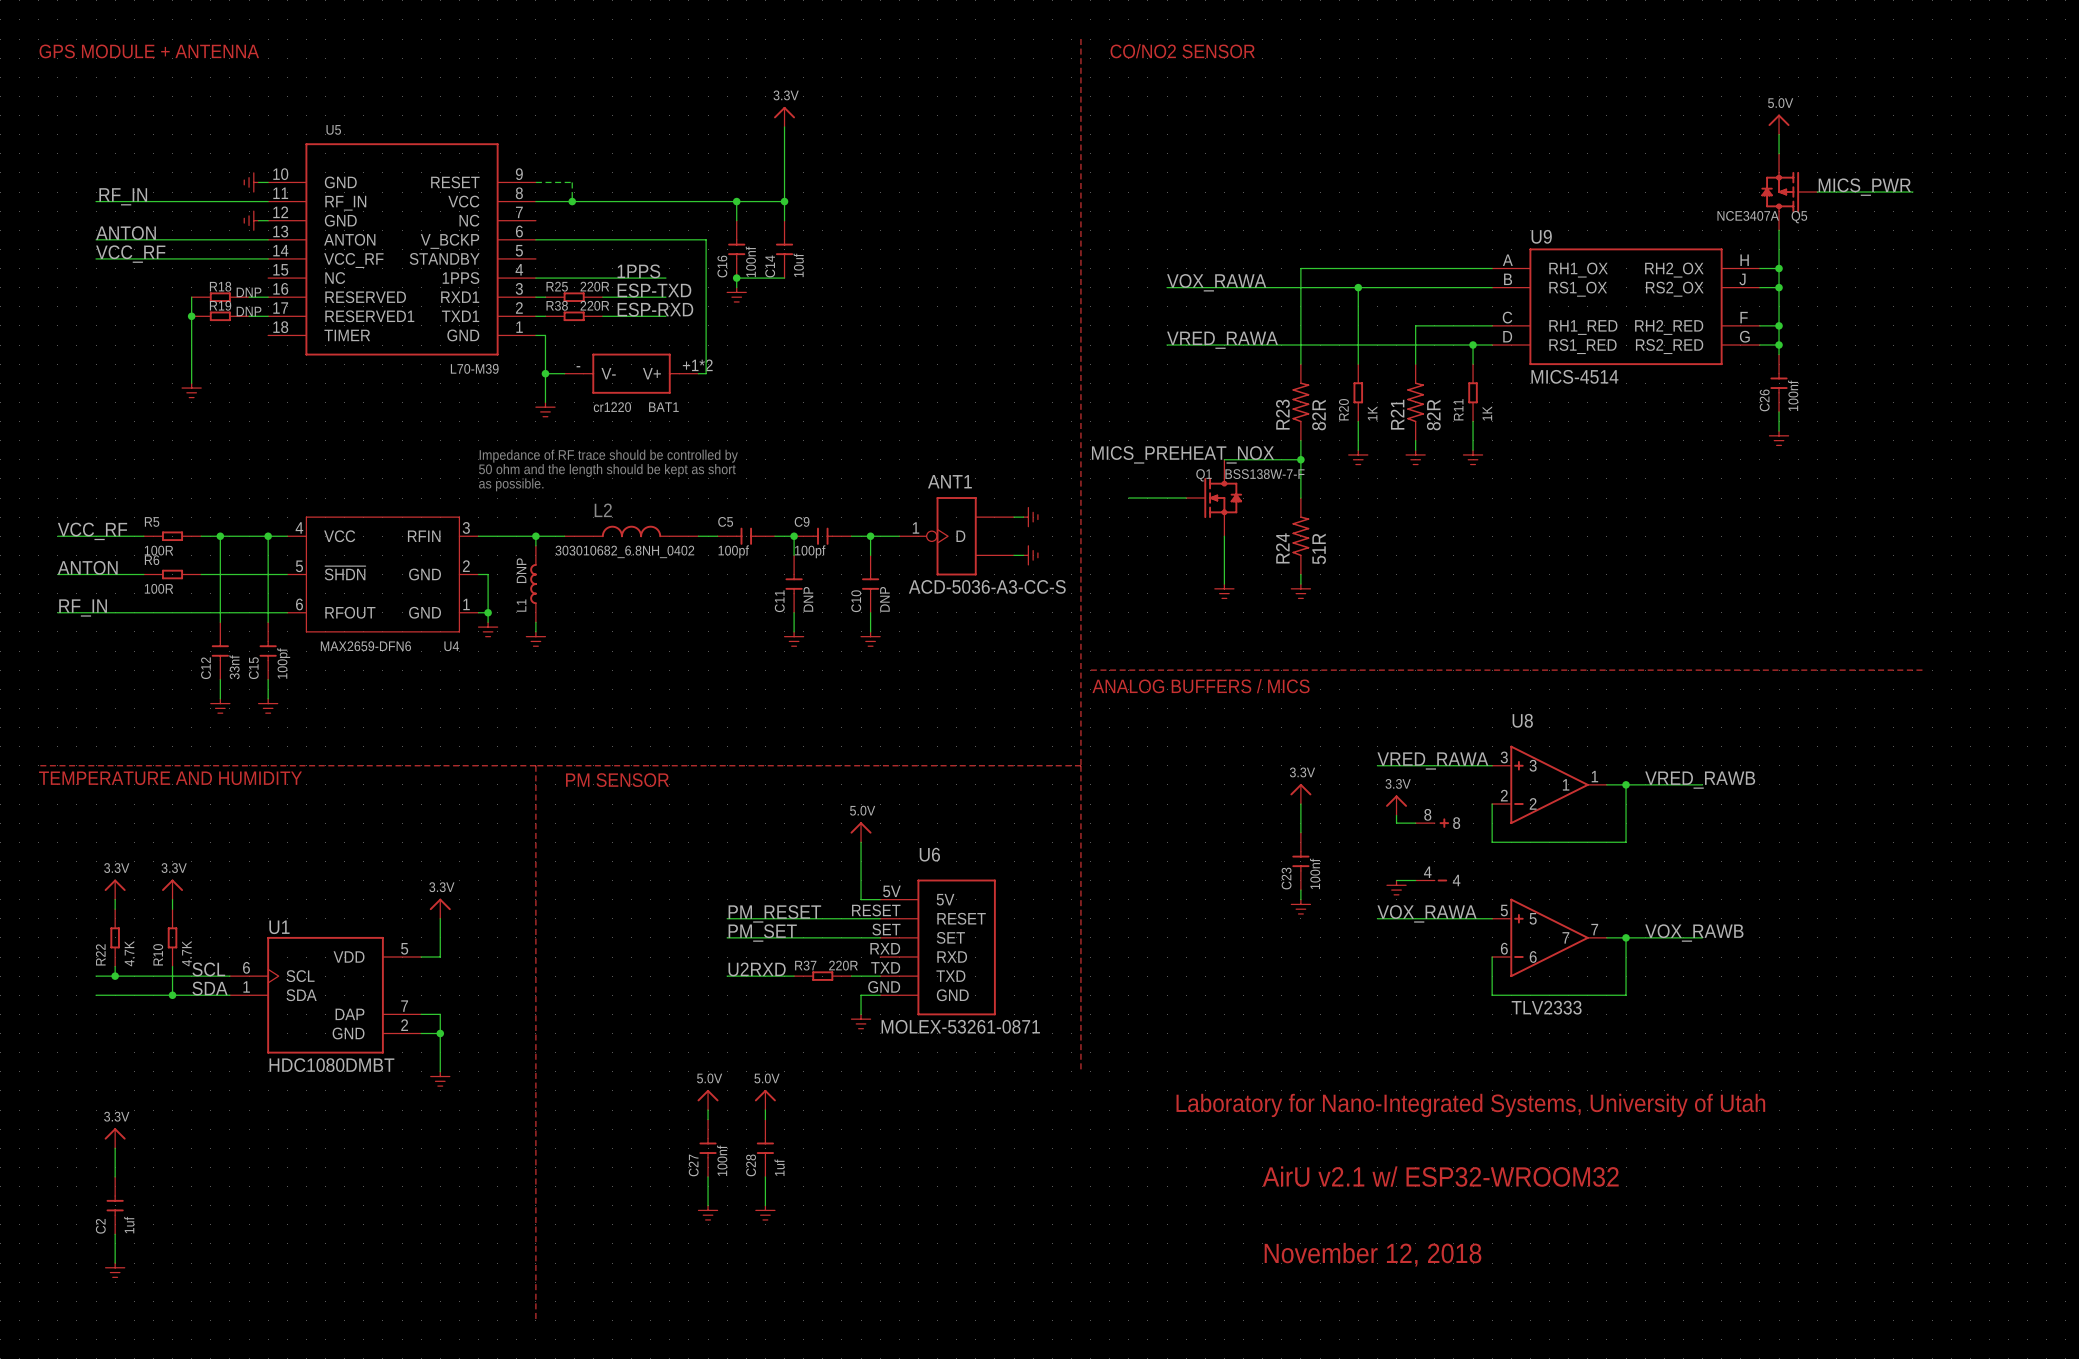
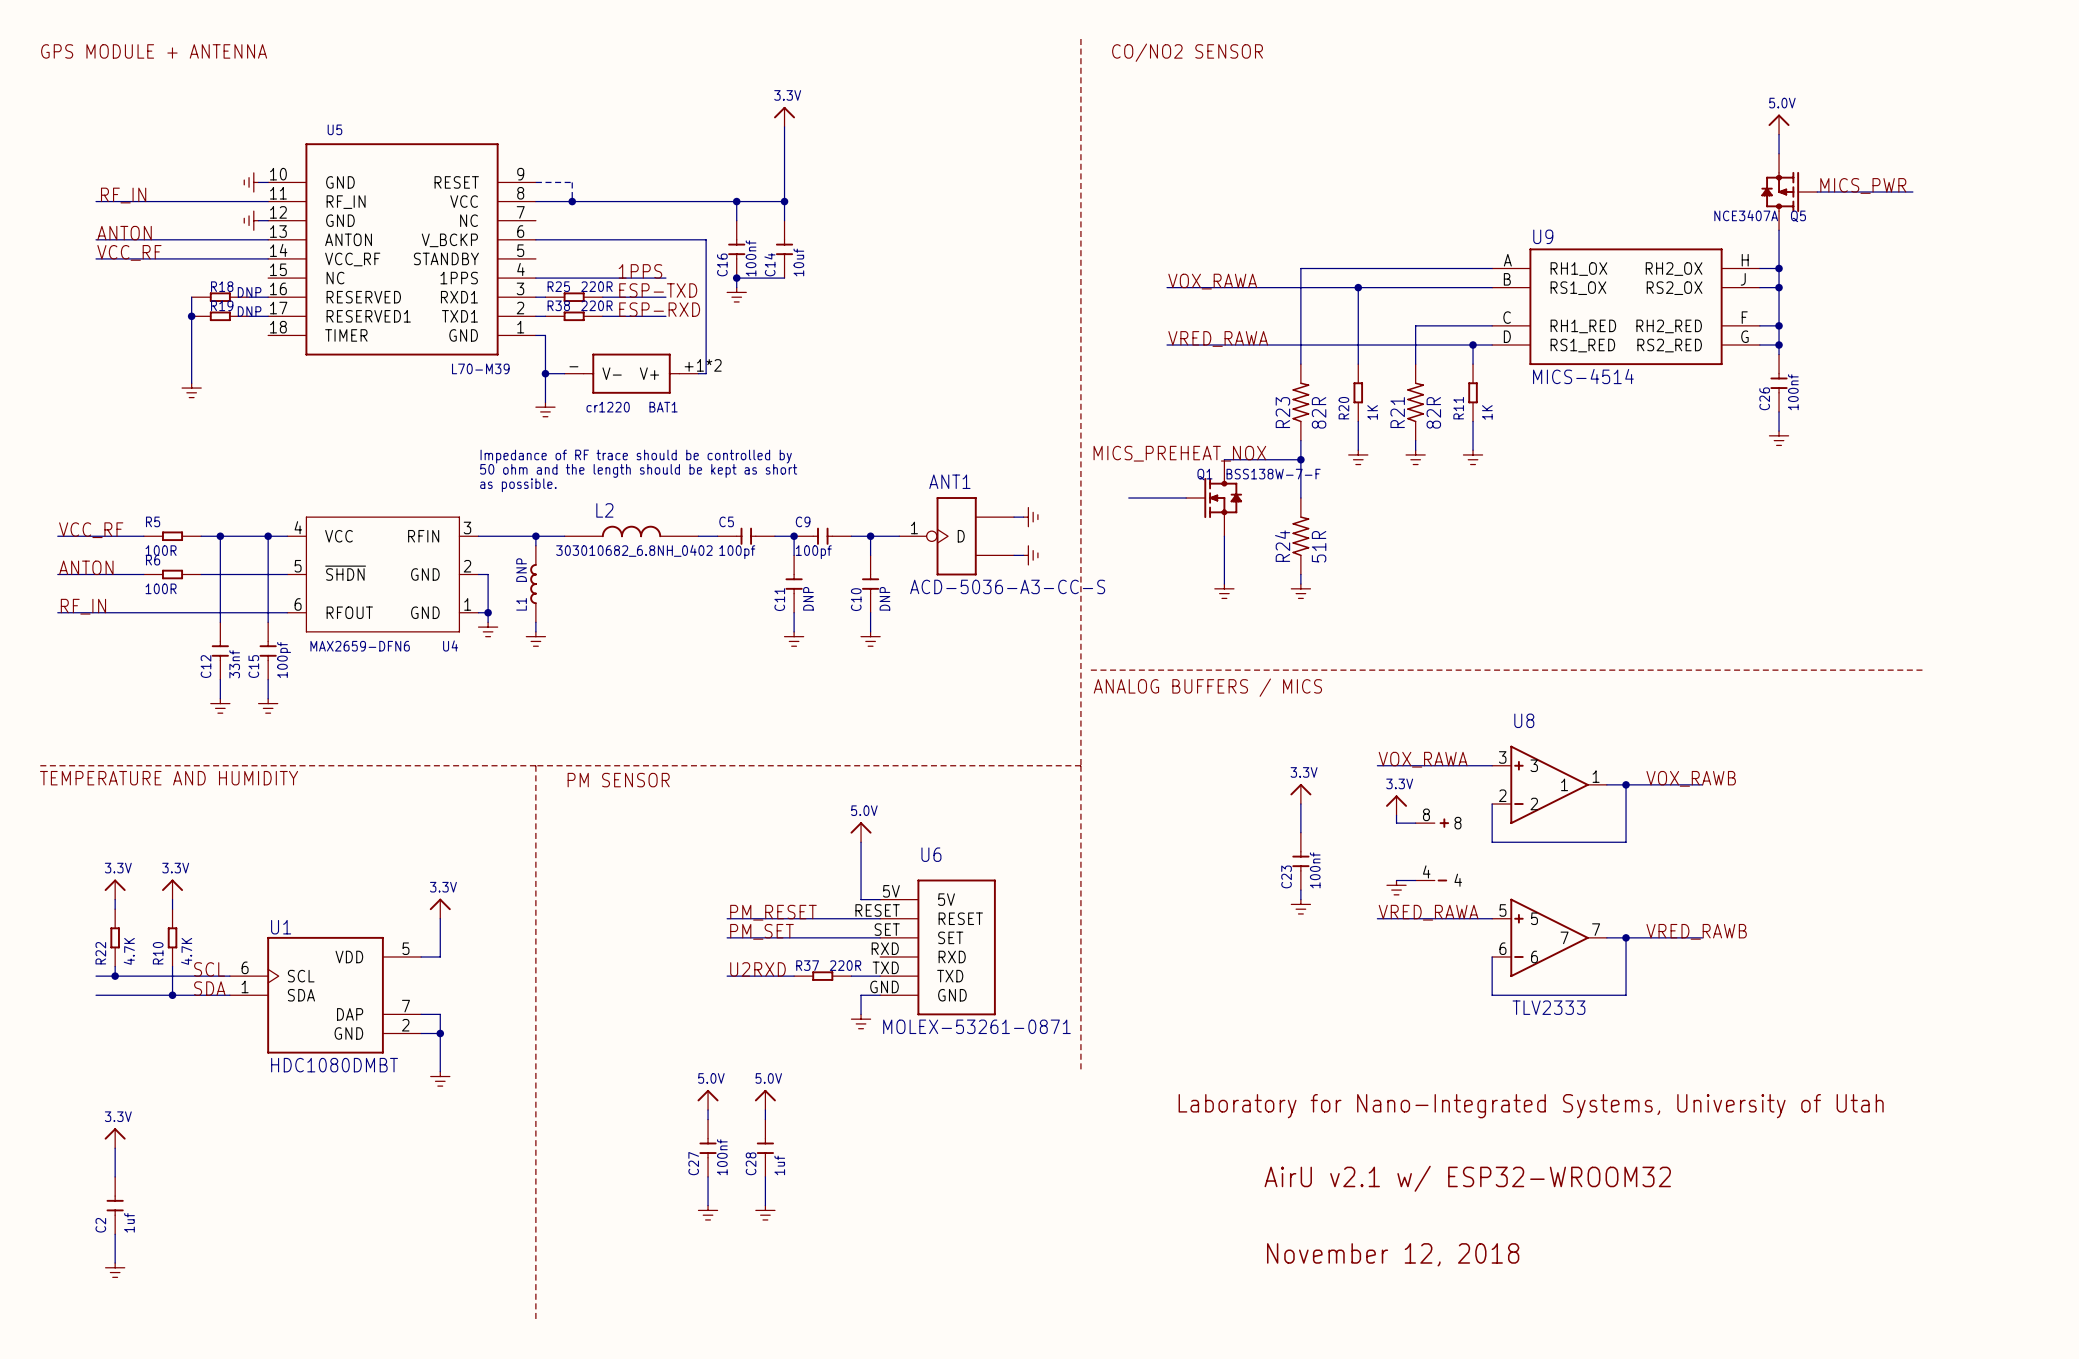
label: VRED_RAWA (1432, 760) -> VOX_RAWA (1423, 759)
label: VRED_RAWB (1700, 780) -> VOX_RAWB (1691, 778)
label: VOX_RAWA (1427, 913) -> VRED_RAWA (1428, 912)
label: VOX_RAWB (1694, 933) -> VRED_RAWB (1696, 931)

